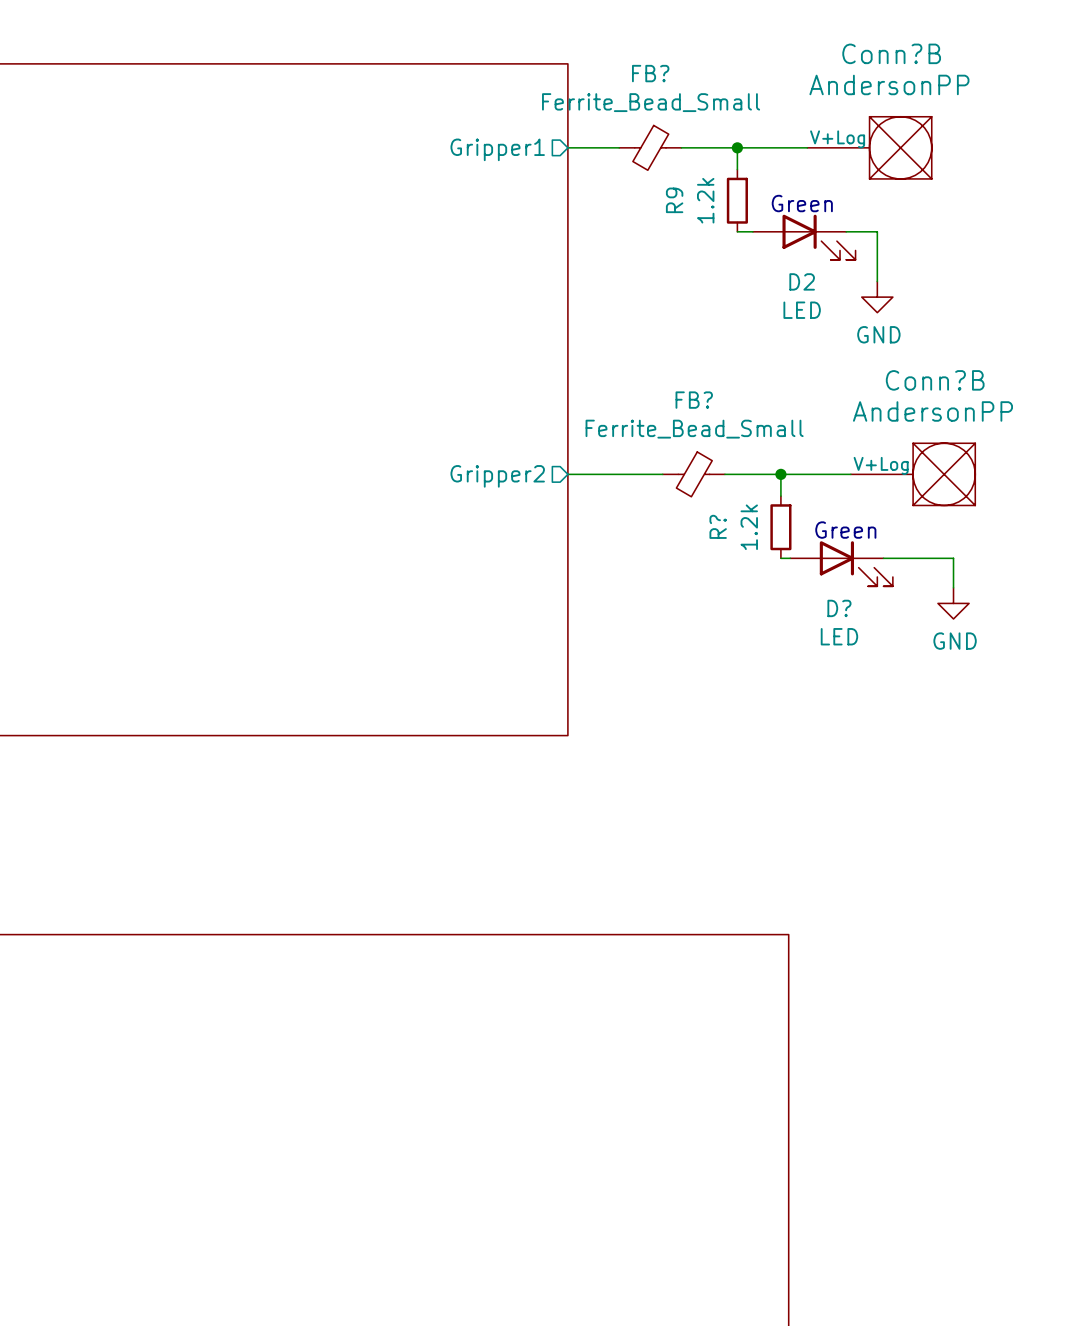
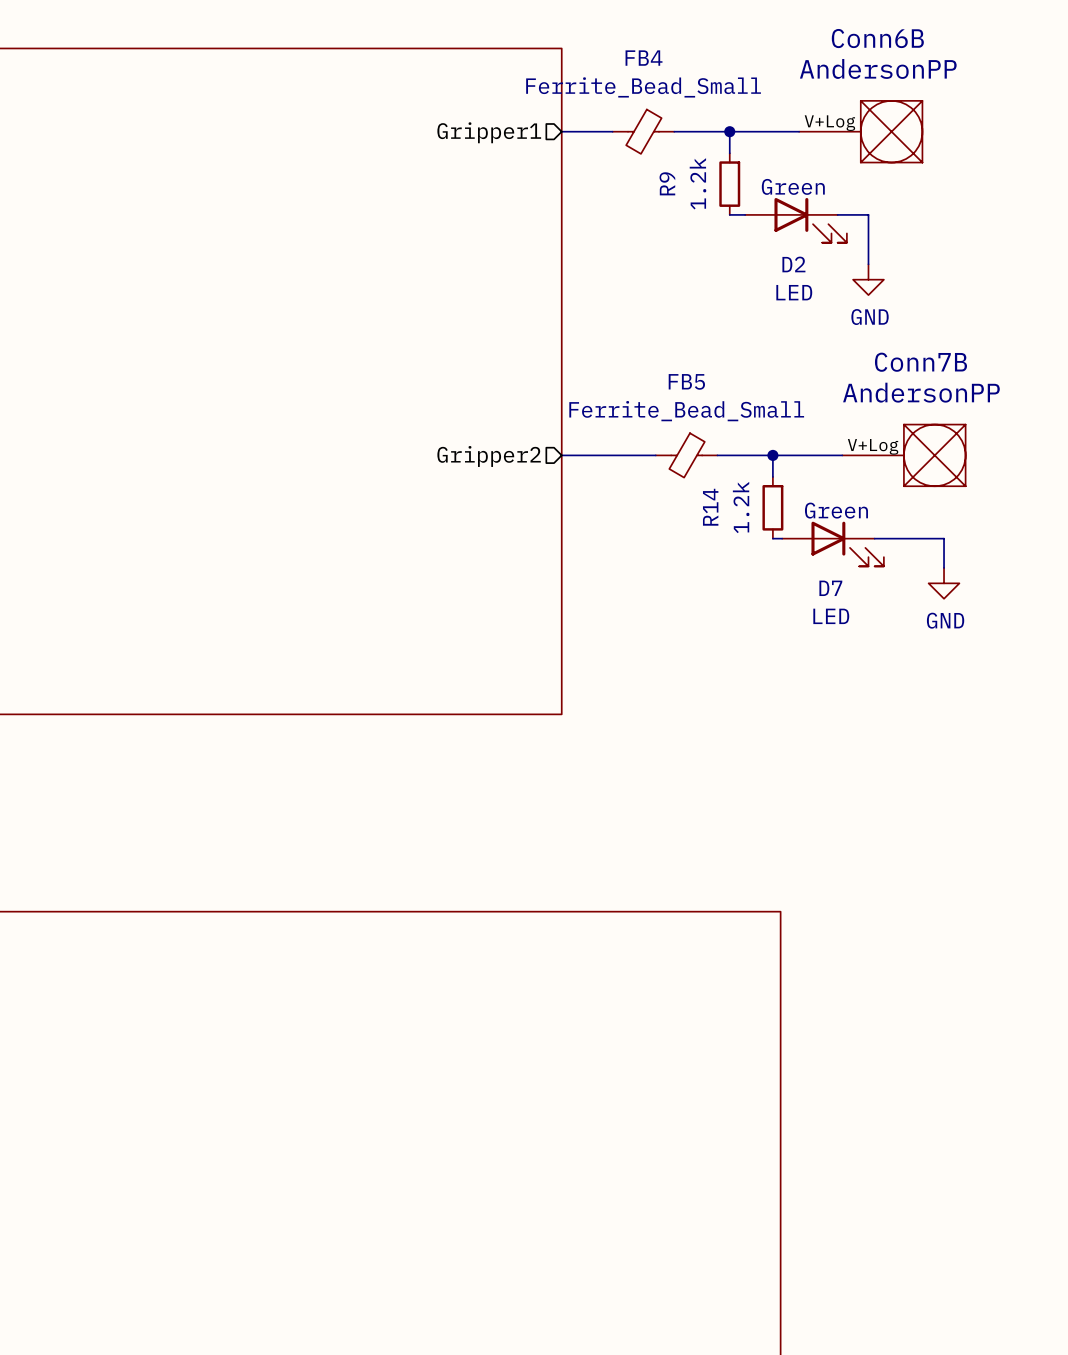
Conn?B name: Conn?B (891, 53) -> Conn6B (877, 38)
FB? name: FB? (650, 73) -> FB4 (644, 58)
Conn?B name: Conn?B (935, 380) -> Conn7B (920, 362)
FB? name: FB? (694, 400) -> FB5 (686, 381)
R? name: R? (718, 526) -> R14 (710, 507)
D? name: D? (839, 608) -> D7 (830, 588)

